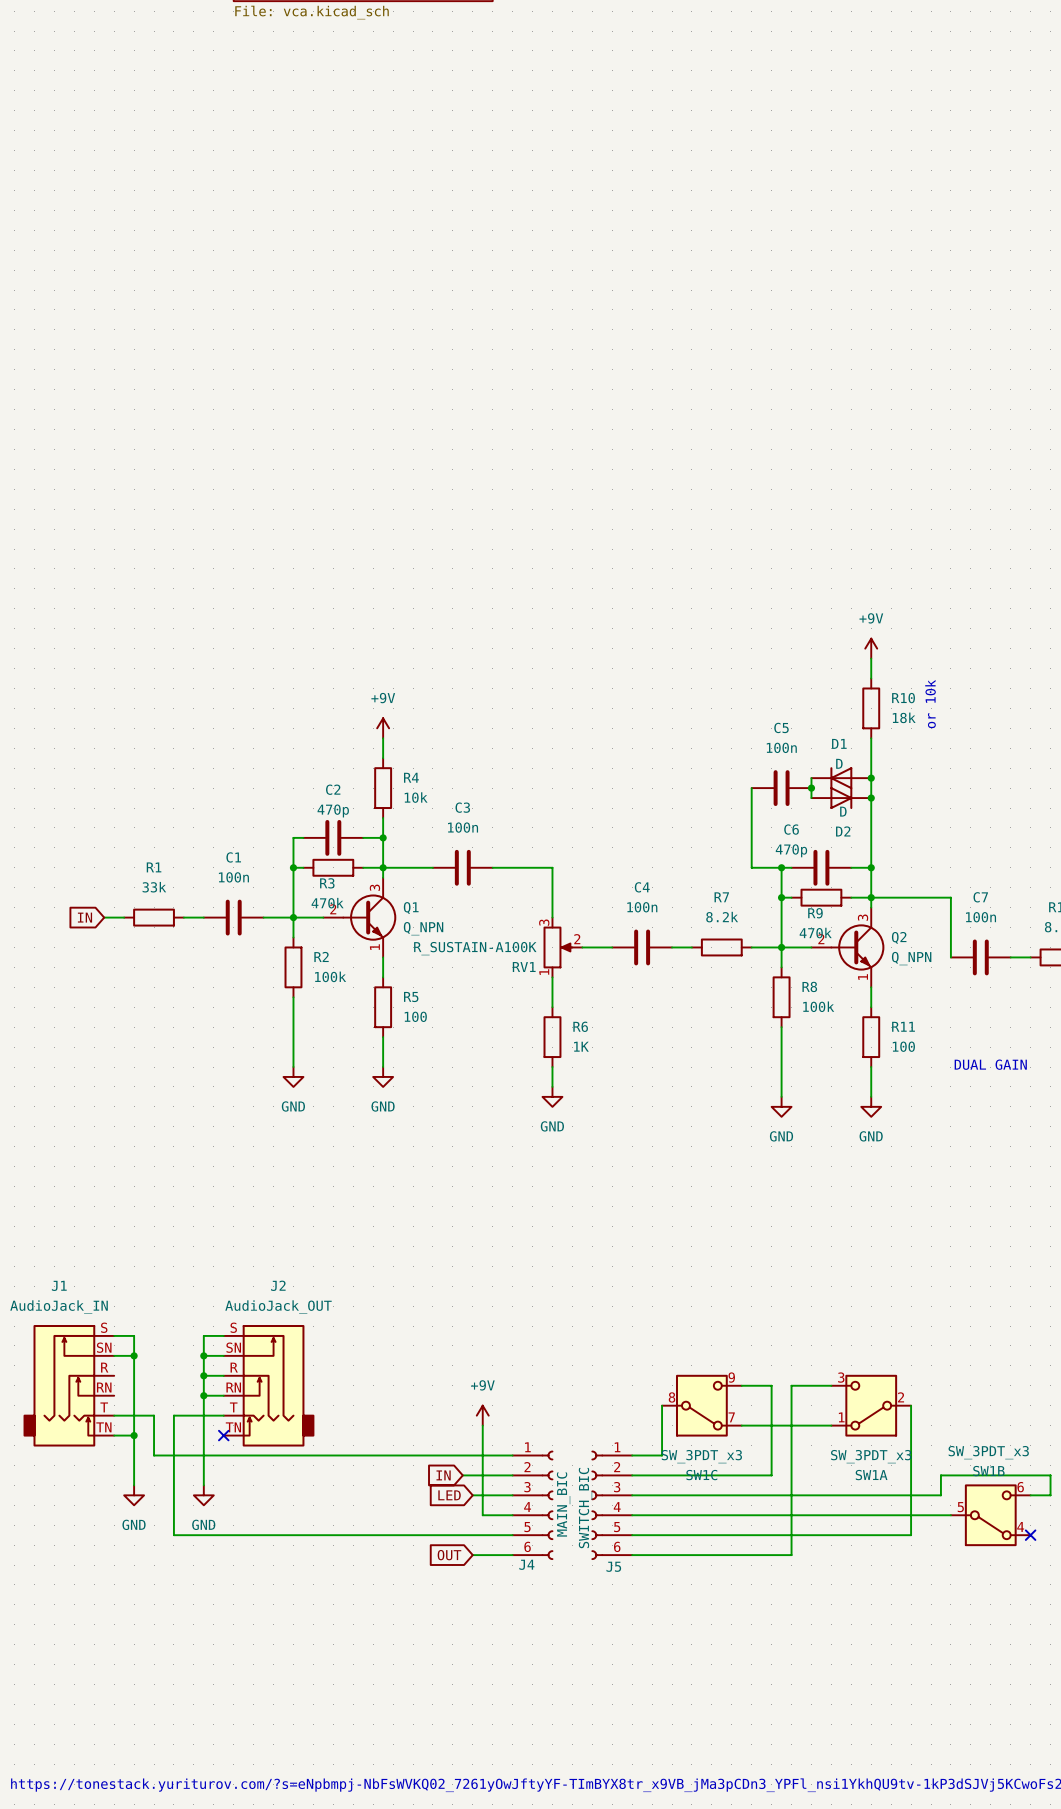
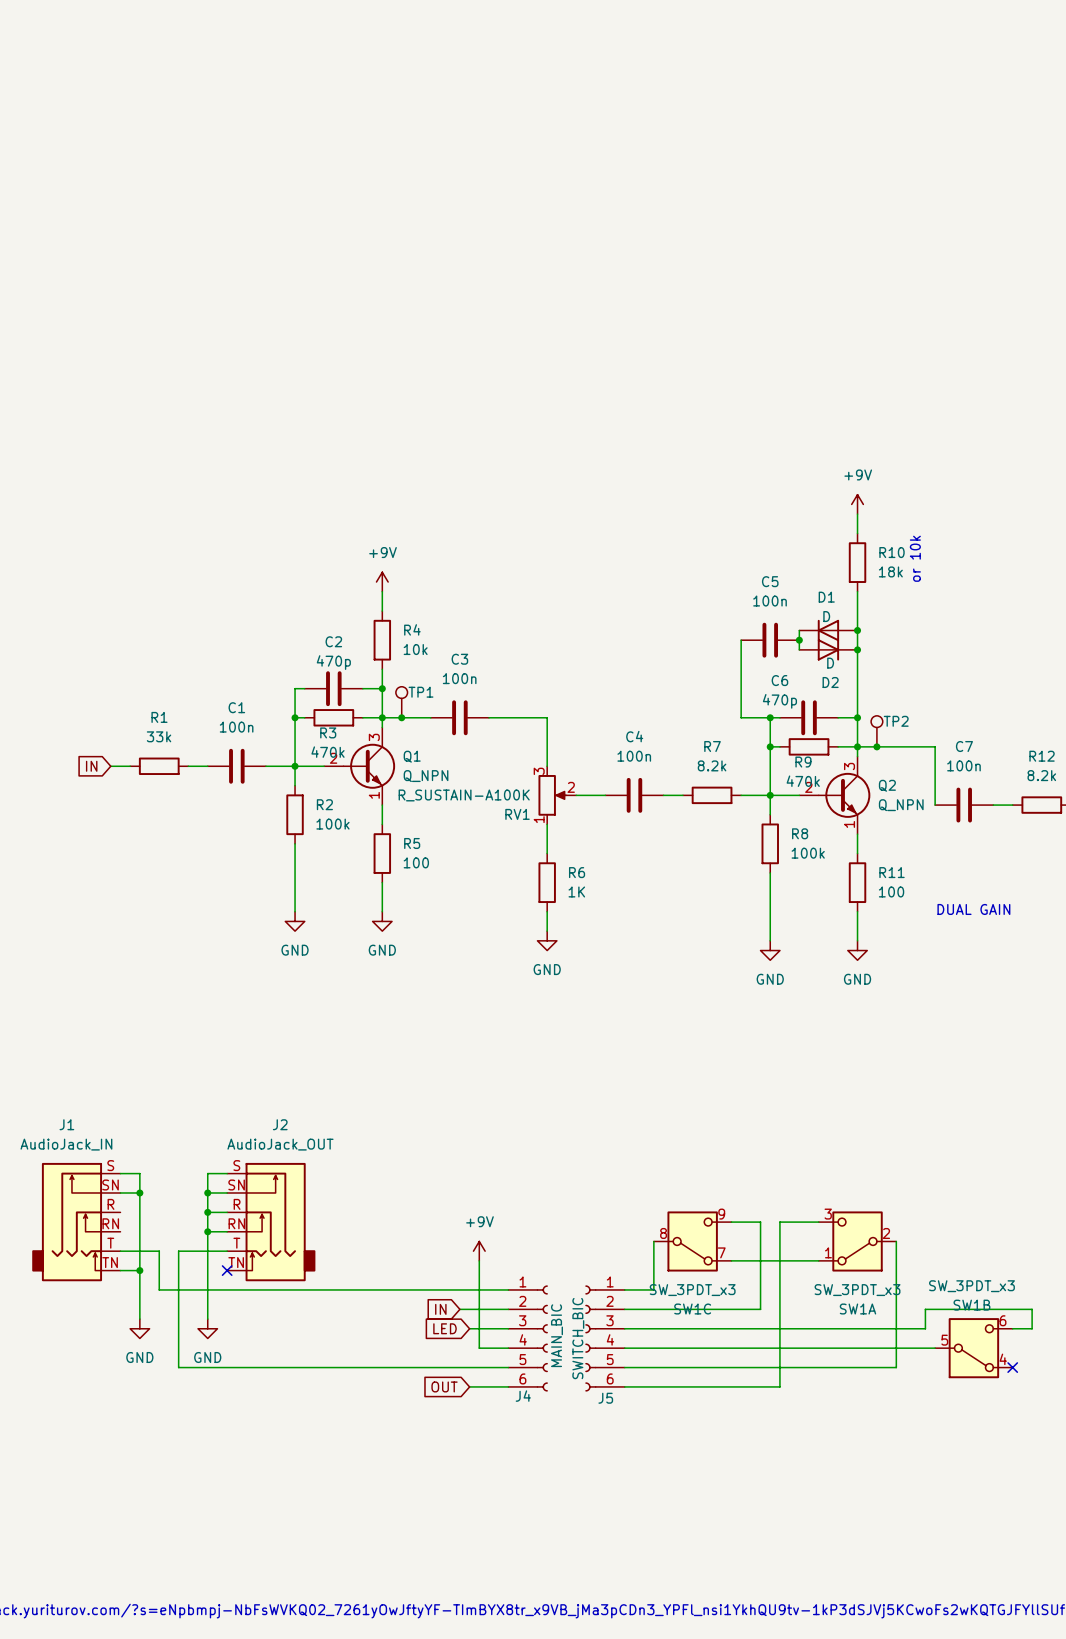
TP1: none -> (401, 702)
junction: none -> (401, 717)
TP2: none -> (876, 731)
junction: none -> (876, 746)

